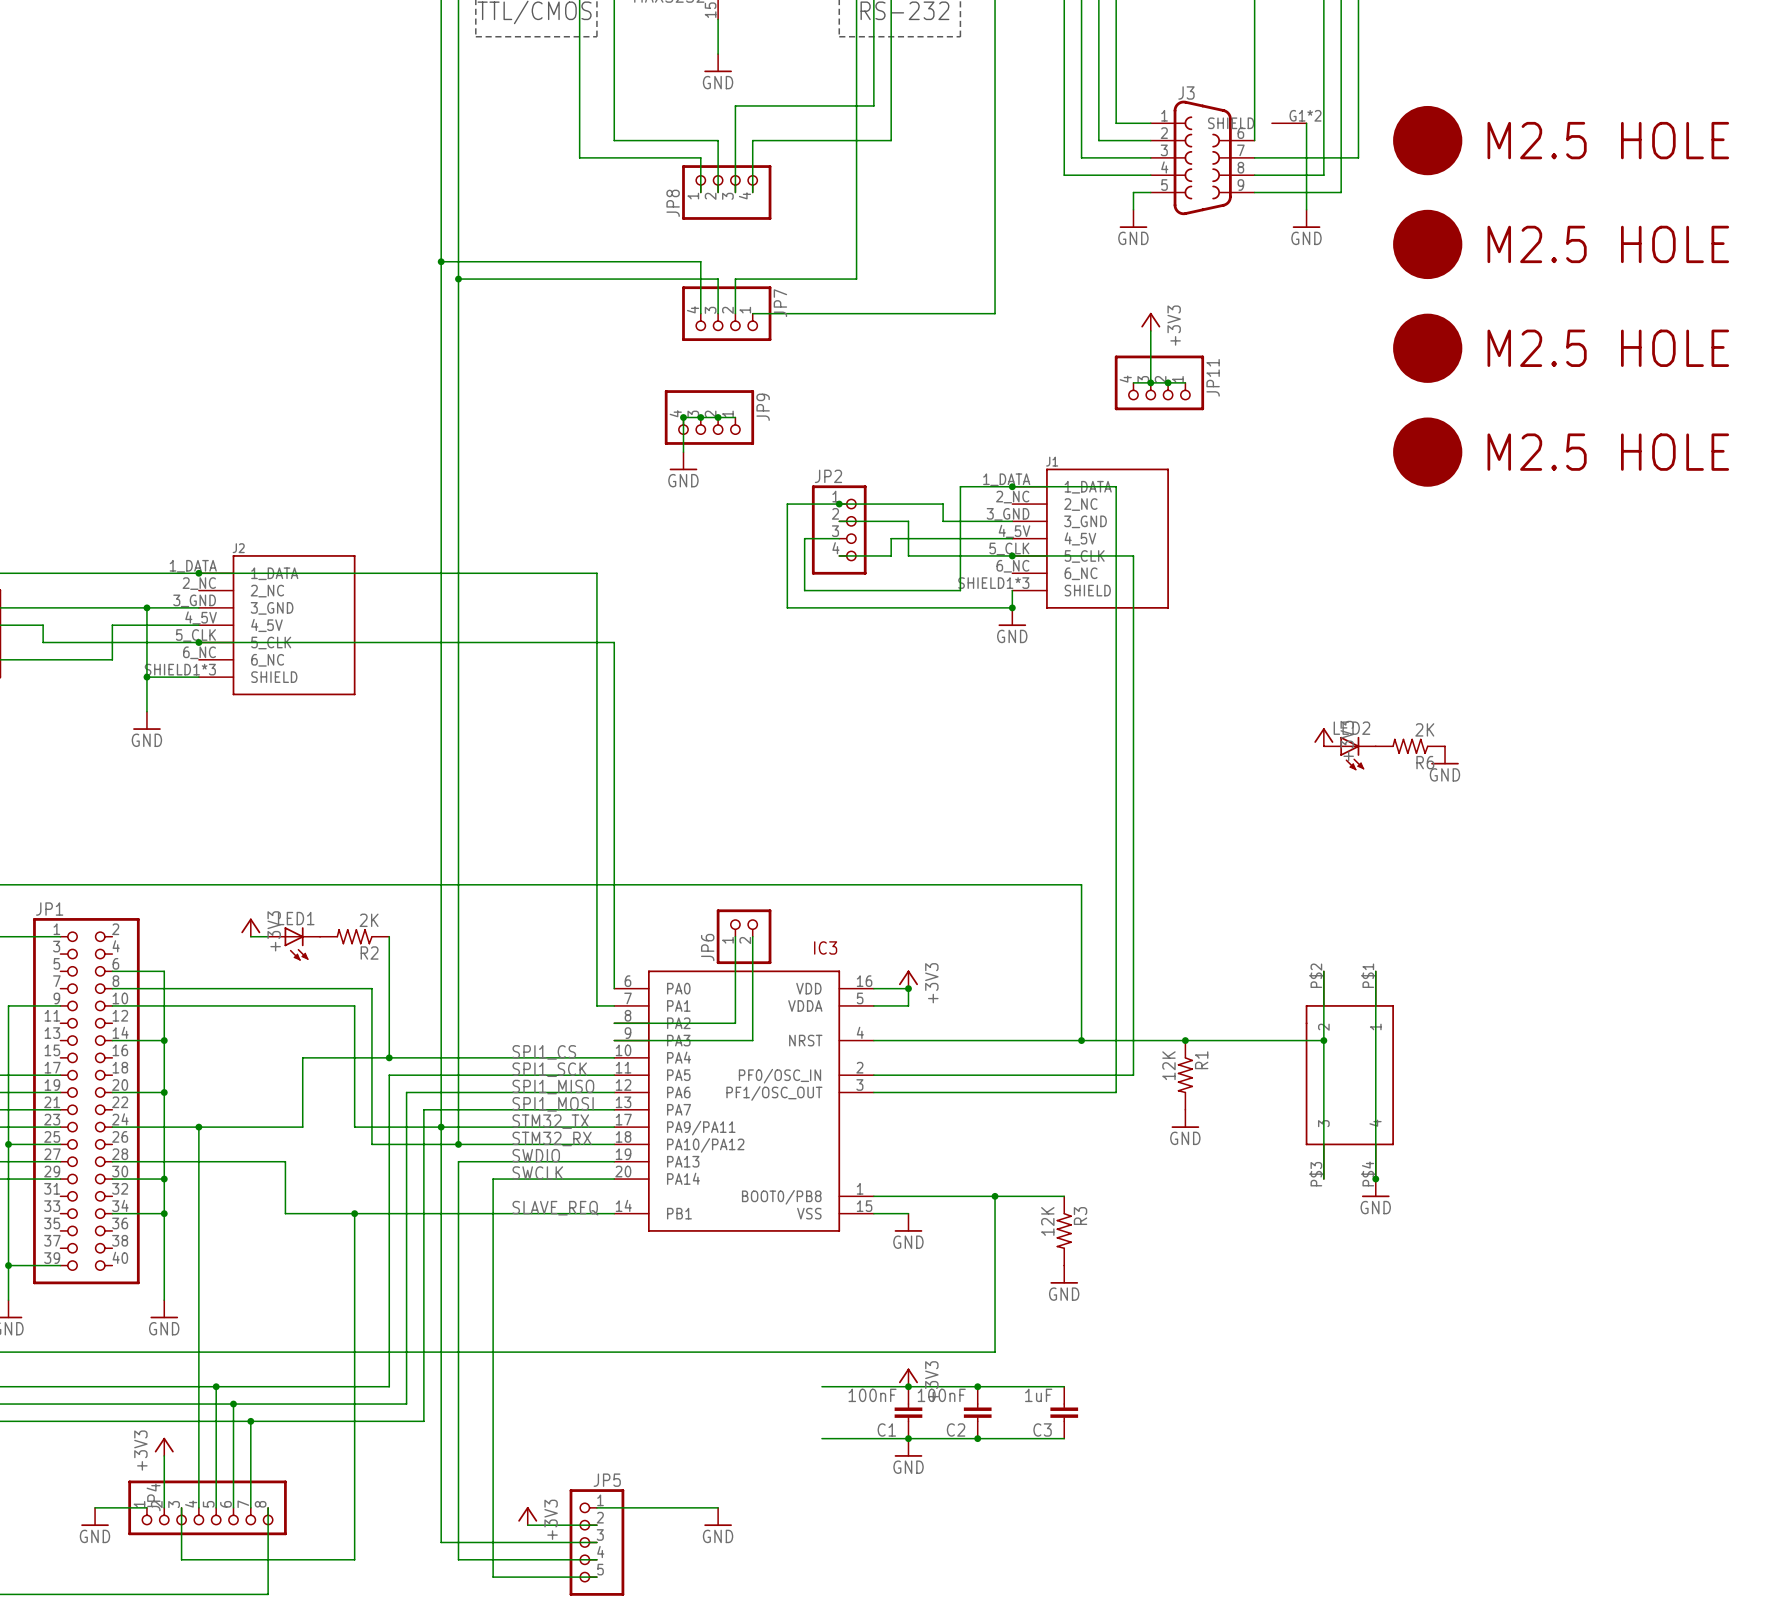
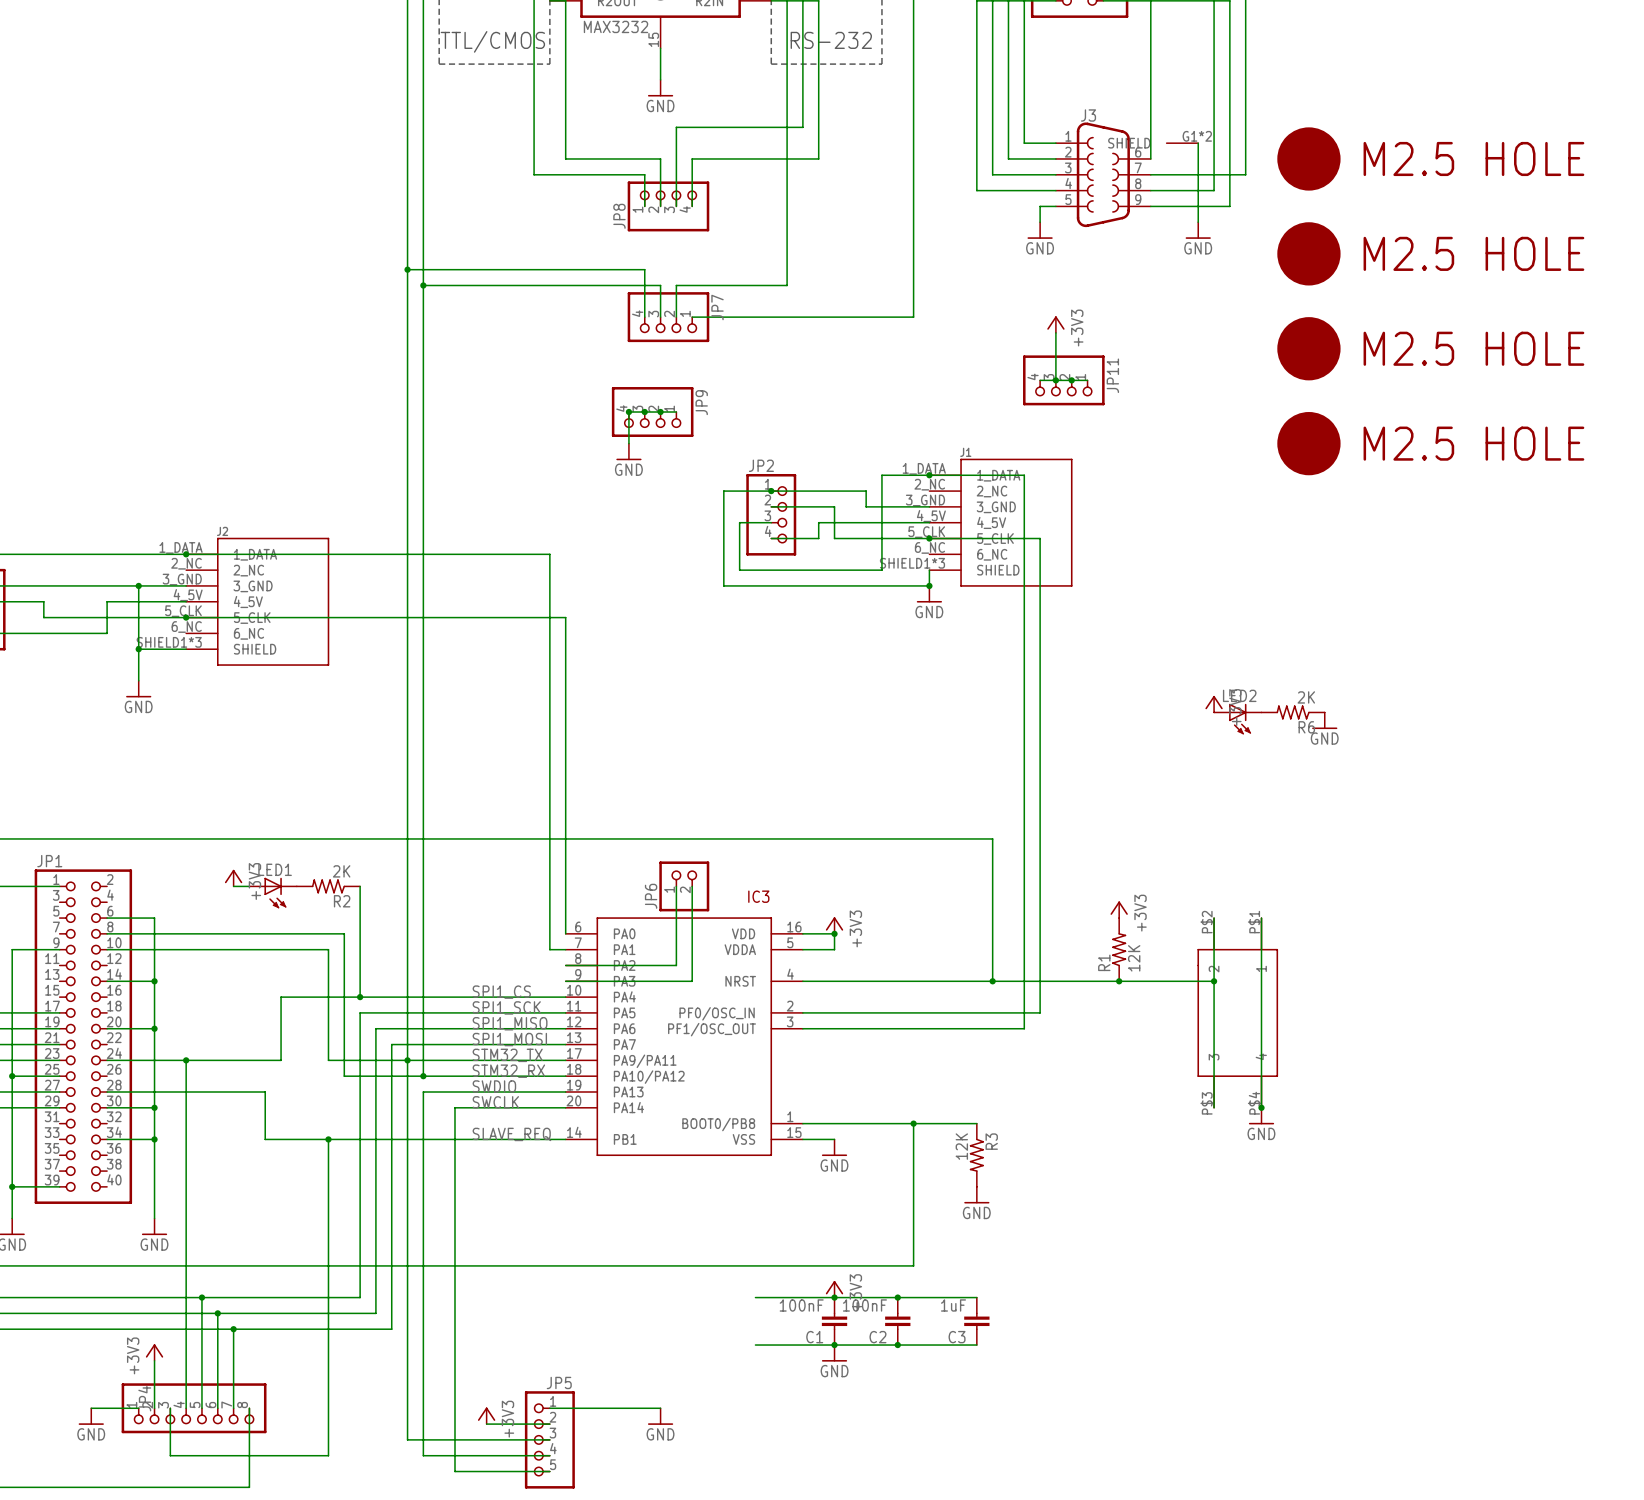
power symbol: none -> +3V3 (1119, 909)
junction position: (1185, 1040) -> (1119, 981)
R1 rotation: 0° (1185, 1075) -> 180° (1119, 949)
R1 position: (1185, 1075) -> (1119, 949)
power symbol: GND (1185, 1118) -> none

